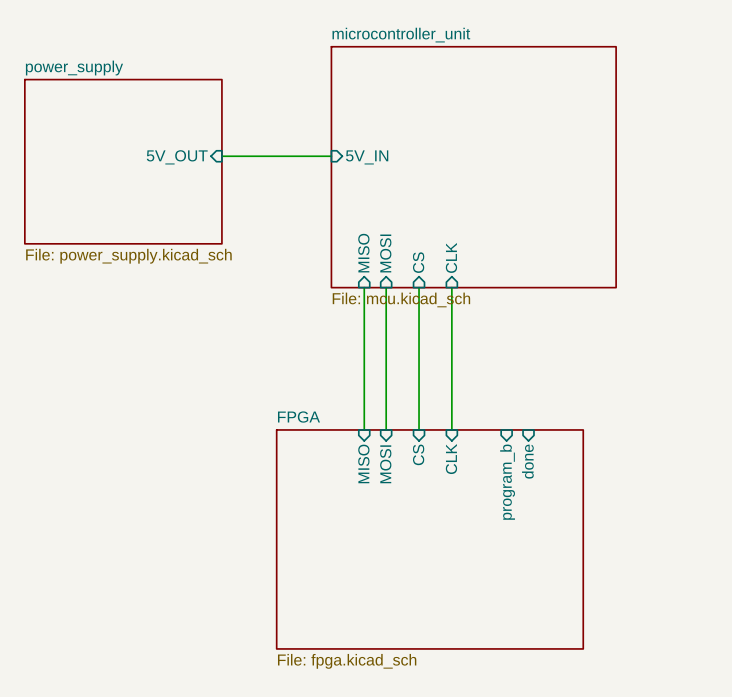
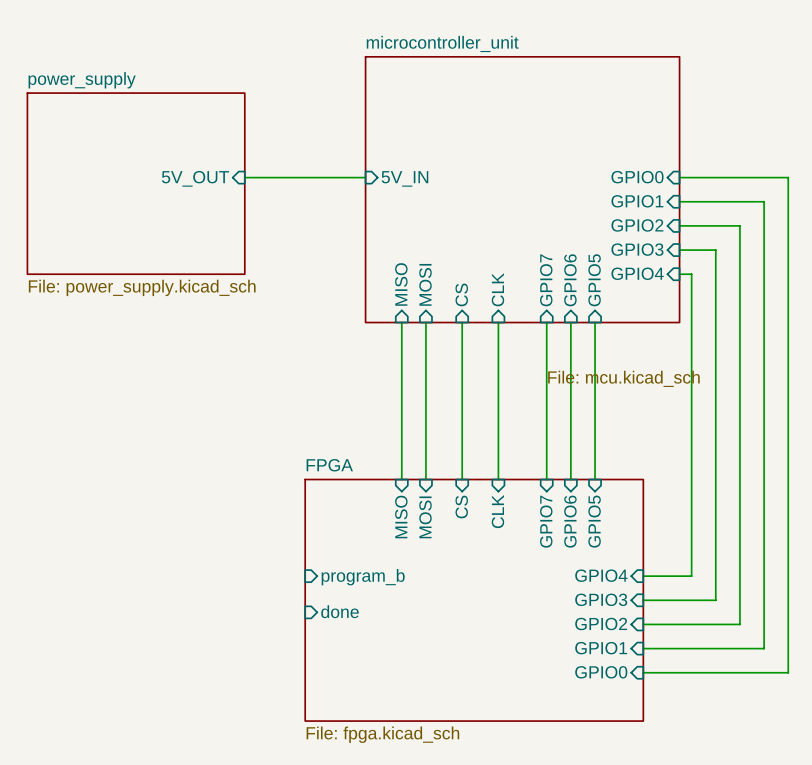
sheet pin: none -> GPIO0 (637, 177)
wire: none -> (679, 177) (788, 177) (788, 672) (643, 672)
sheet pin: none -> GPIO1 (637, 201)
wire: none -> (679, 201) (764, 201) (764, 648) (643, 648)
sheet pin: none -> GPIO2 (637, 225)
wire: none -> (679, 225) (739, 225) (739, 624) (643, 624)
sheet pin: none -> GPIO3 (637, 249)
wire: none -> (679, 250) (715, 250) (715, 600) (643, 600)
sheet pin: none -> GPIO4 (637, 273)
wire: none -> (679, 274) (691, 274) (691, 576) (643, 576)
sheet pin: none -> GPIO7 (546, 280)
sheet pin: none -> GPIO6 (570, 280)
sheet pin: none -> GPIO5 (594, 280)
wire: none -> (546, 322) (546, 479)
wire: none -> (570, 322) (570, 479)
wire: none -> (595, 322) (595, 479)
sheet microcontroller_unit value position: File: mcu.kicad_sch (401, 299) -> File: mcu.kicad_sch (623, 378)
sheet pin: done (527, 461) -> none
sheet pin: none -> GPIO7 (546, 521)
sheet pin: none -> GPIO6 (570, 521)
sheet pin: none -> GPIO5 (594, 521)
sheet pin: program_b (507, 482) -> none
sheet pin: none -> GPIO4 (601, 575)
sheet pin: none -> program_b (363, 577)
sheet pin: none -> GPIO3 (601, 599)
sheet pin: none -> done (340, 611)
sheet pin: none -> GPIO2 (601, 623)
sheet pin: none -> GPIO1 (601, 648)
sheet pin: none -> GPIO0 (601, 672)

